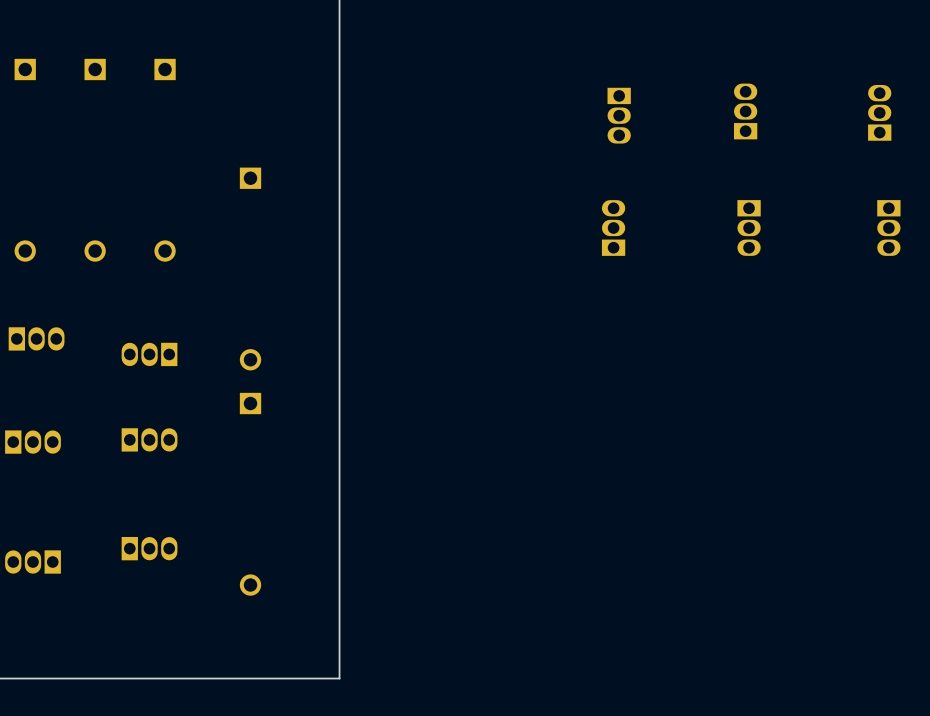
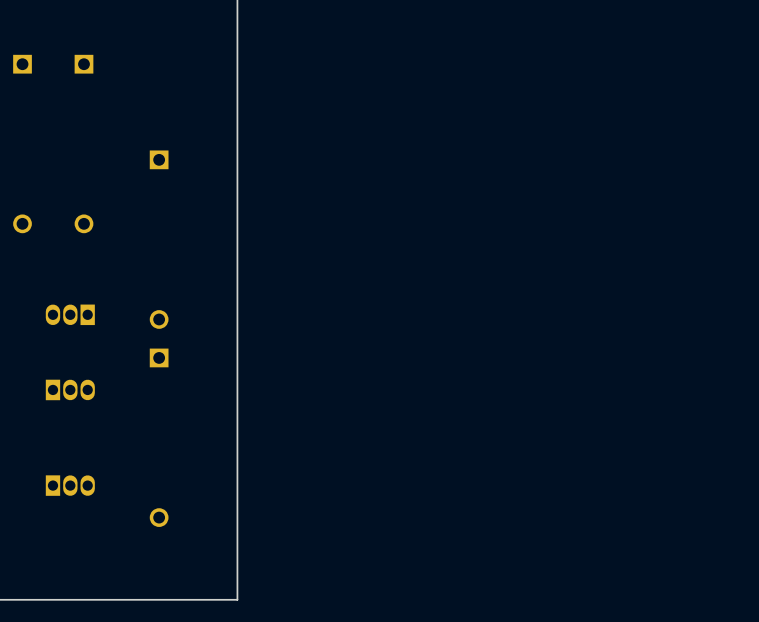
part: (745, 111) -> none
part: (879, 112) -> none
part: (619, 115) -> none
part: (613, 227) -> none
part: (749, 227) -> none
part: (888, 227) -> none

